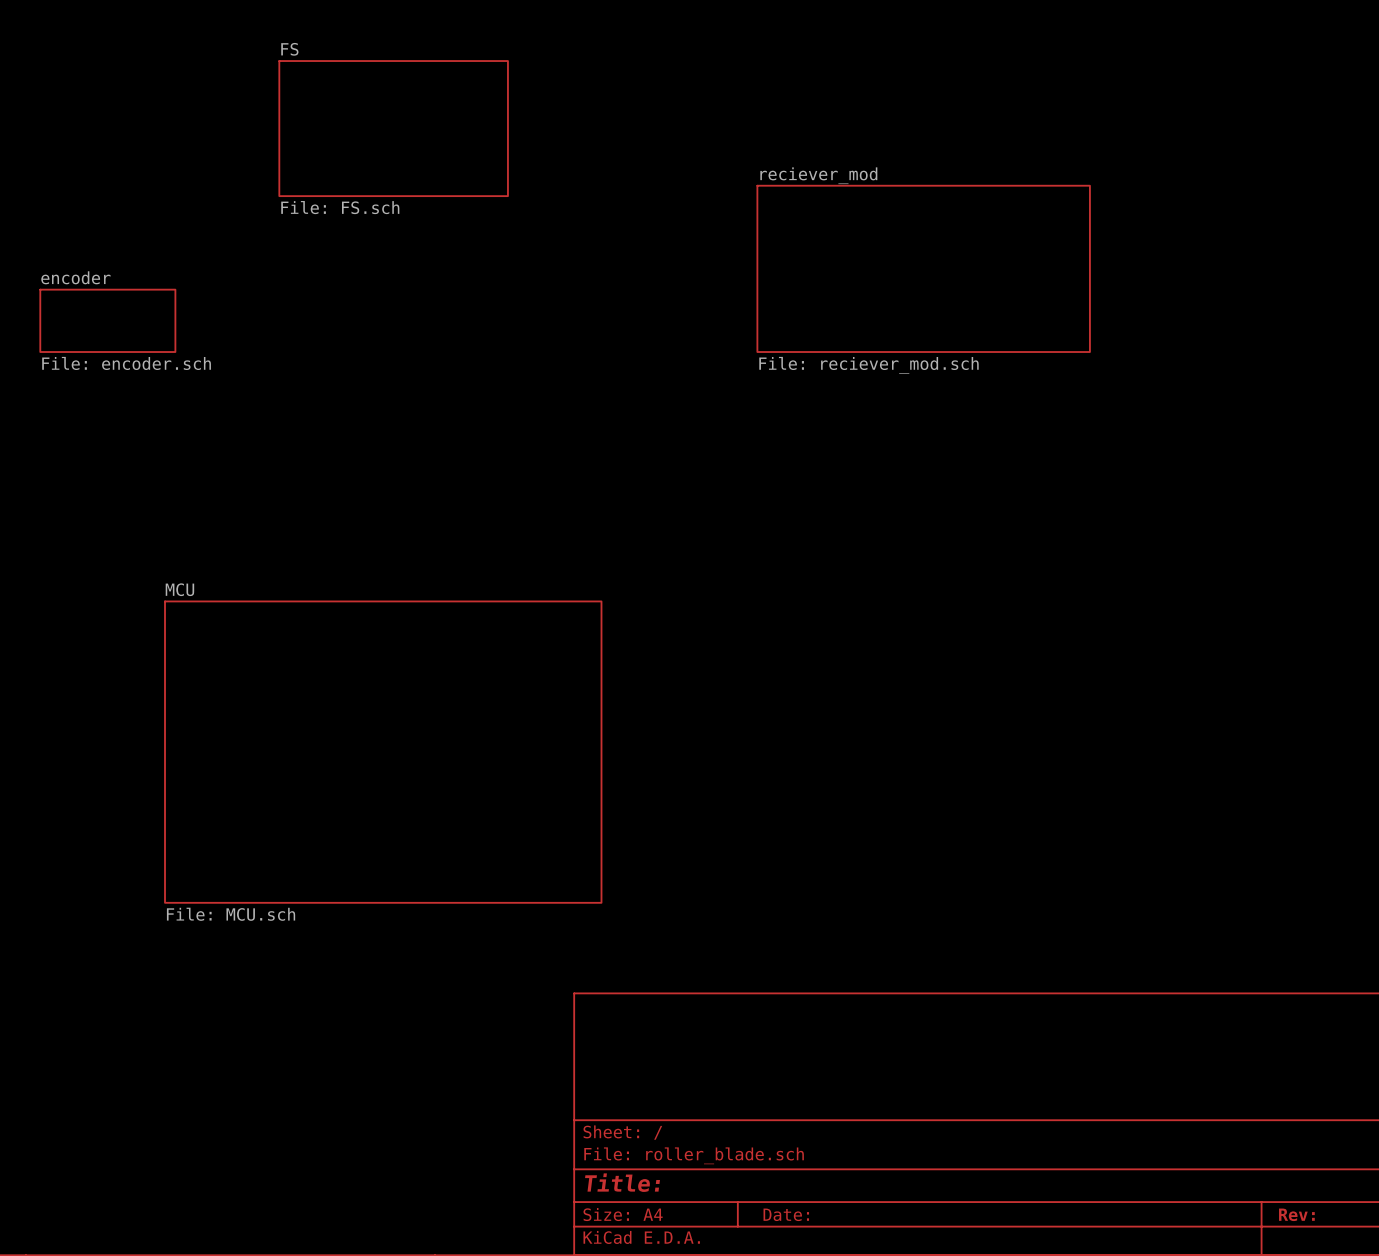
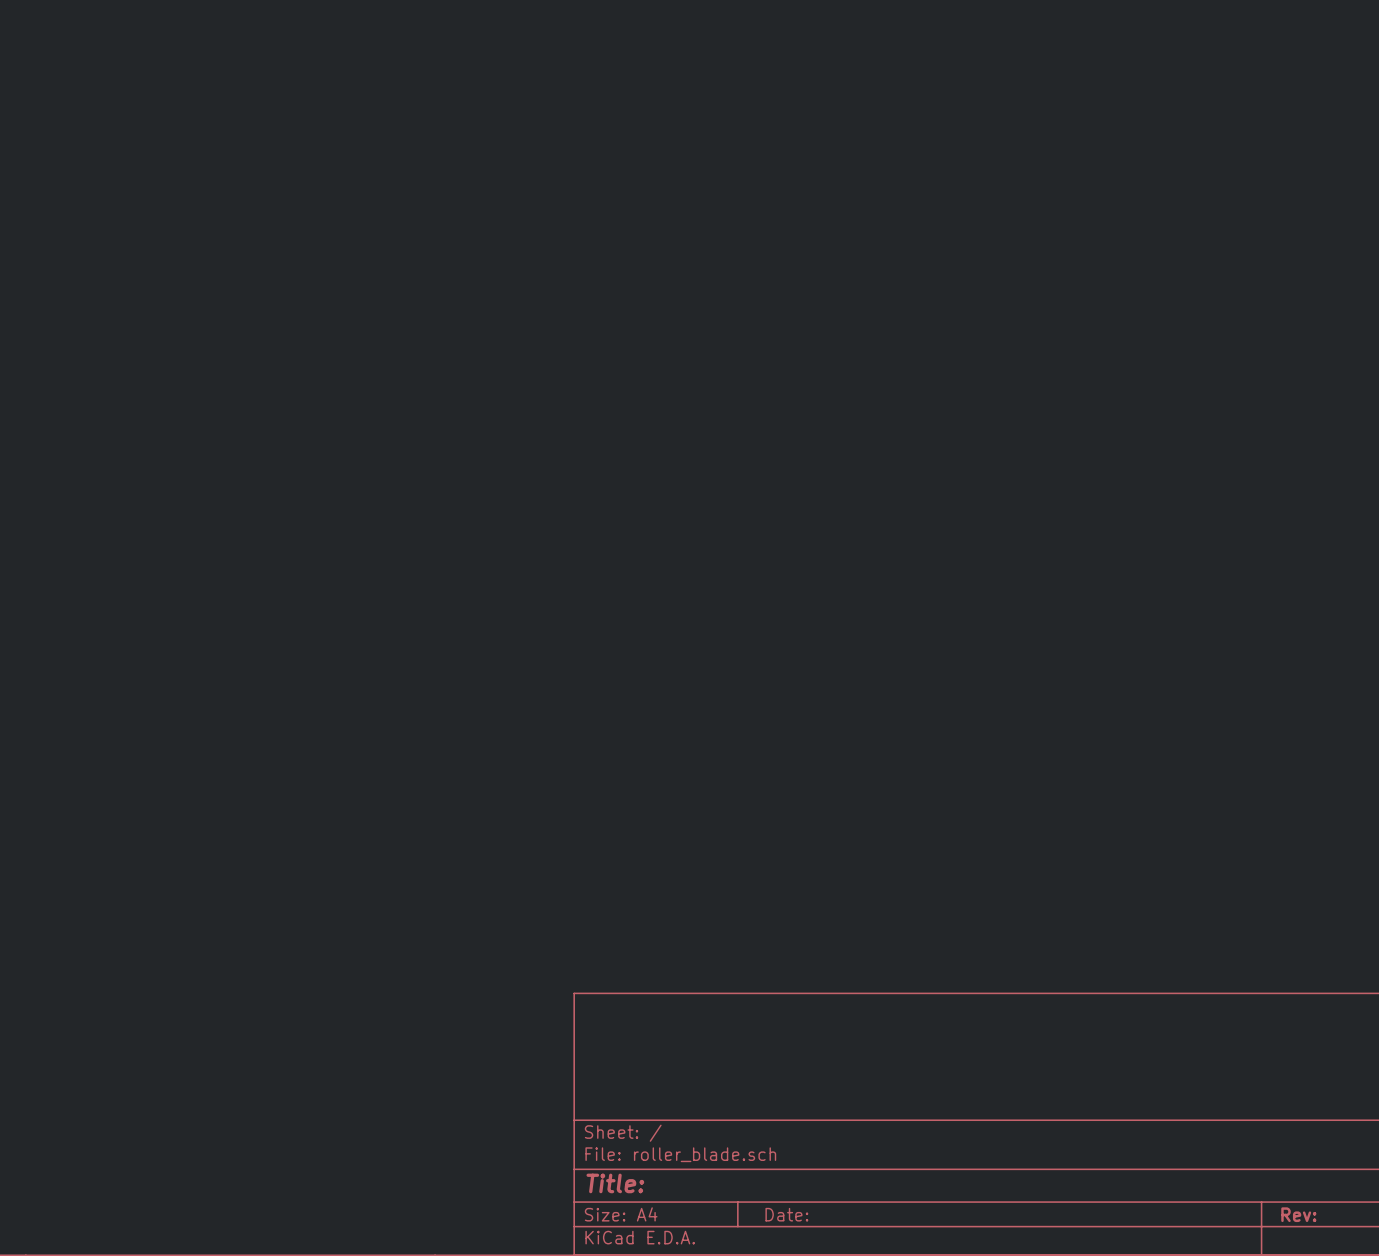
sheet FS: File: FS.sch (393, 128) -> none
sheet reciever_mod: File: reciever_mod.sch (923, 268) -> none
sheet encoder: File: encoder.sch (107, 320) -> none
sheet MCU: File: MCU.sch (383, 752) -> none

